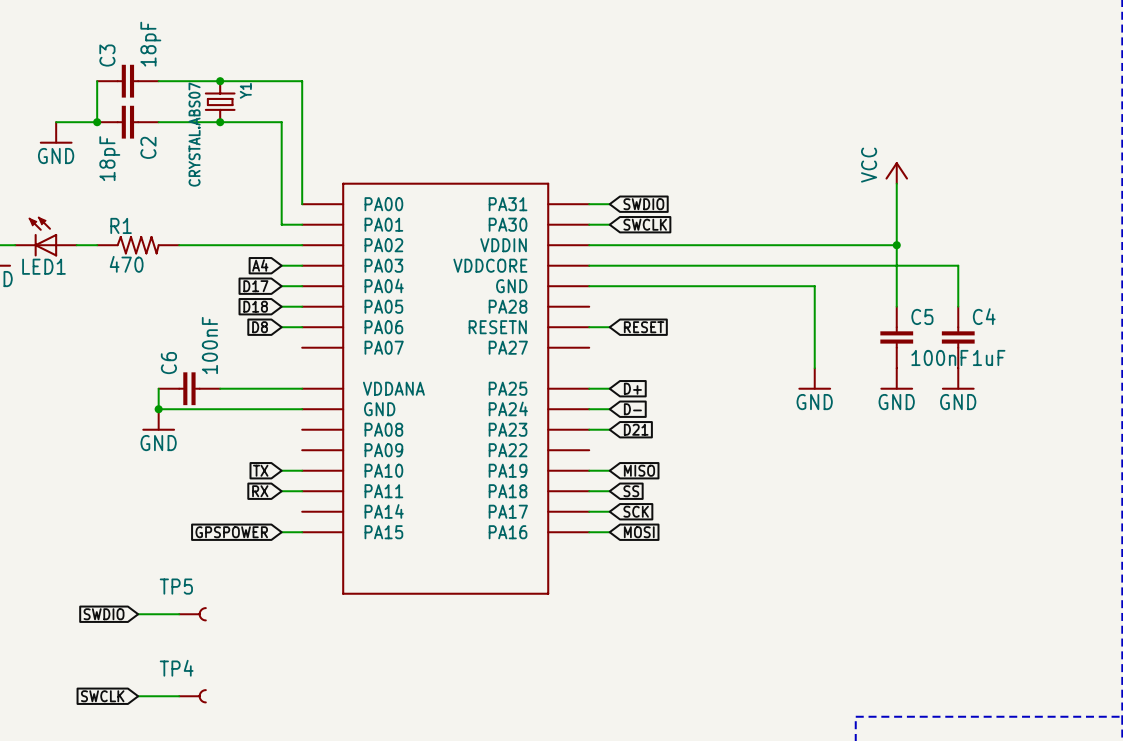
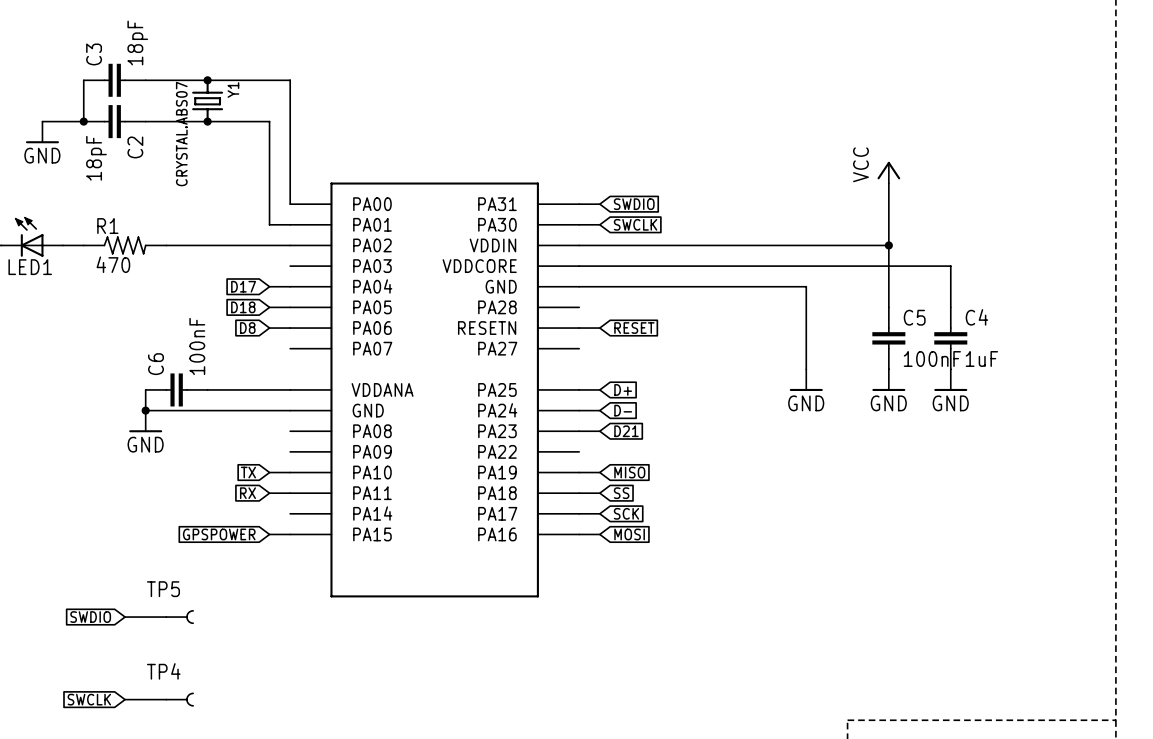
global label: A4 (260, 265) -> none
wire: (281, 265) (302, 265) -> none

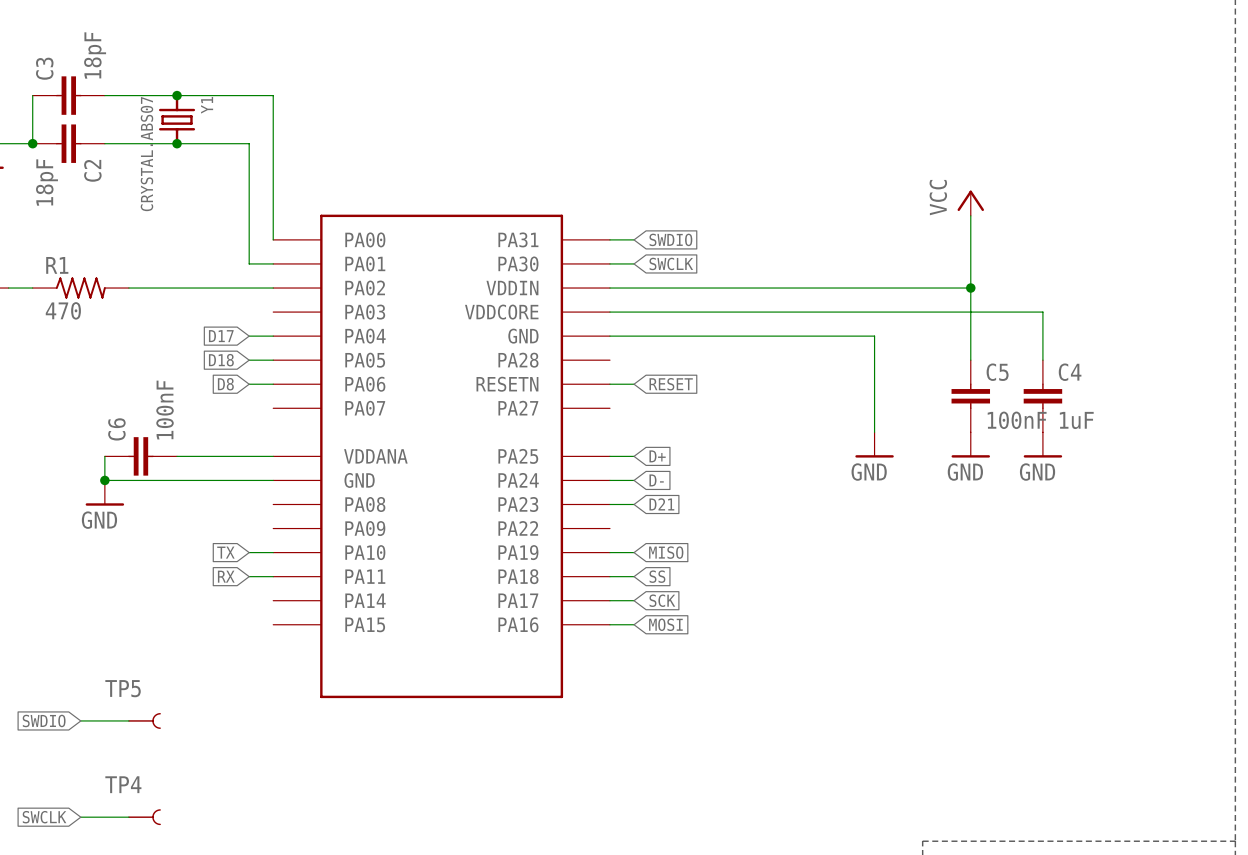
global label: GPSPOWER (219, 534) -> none
wire: (269, 534) (290, 534) -> none

